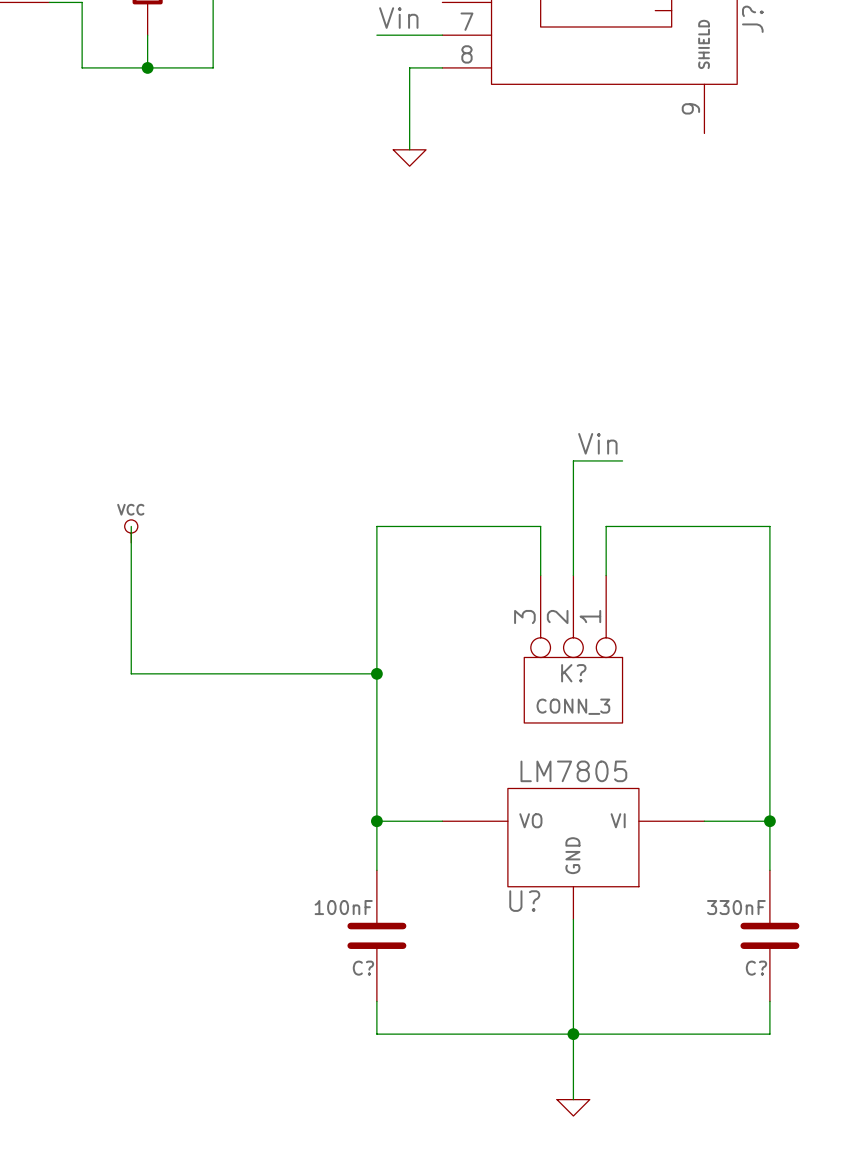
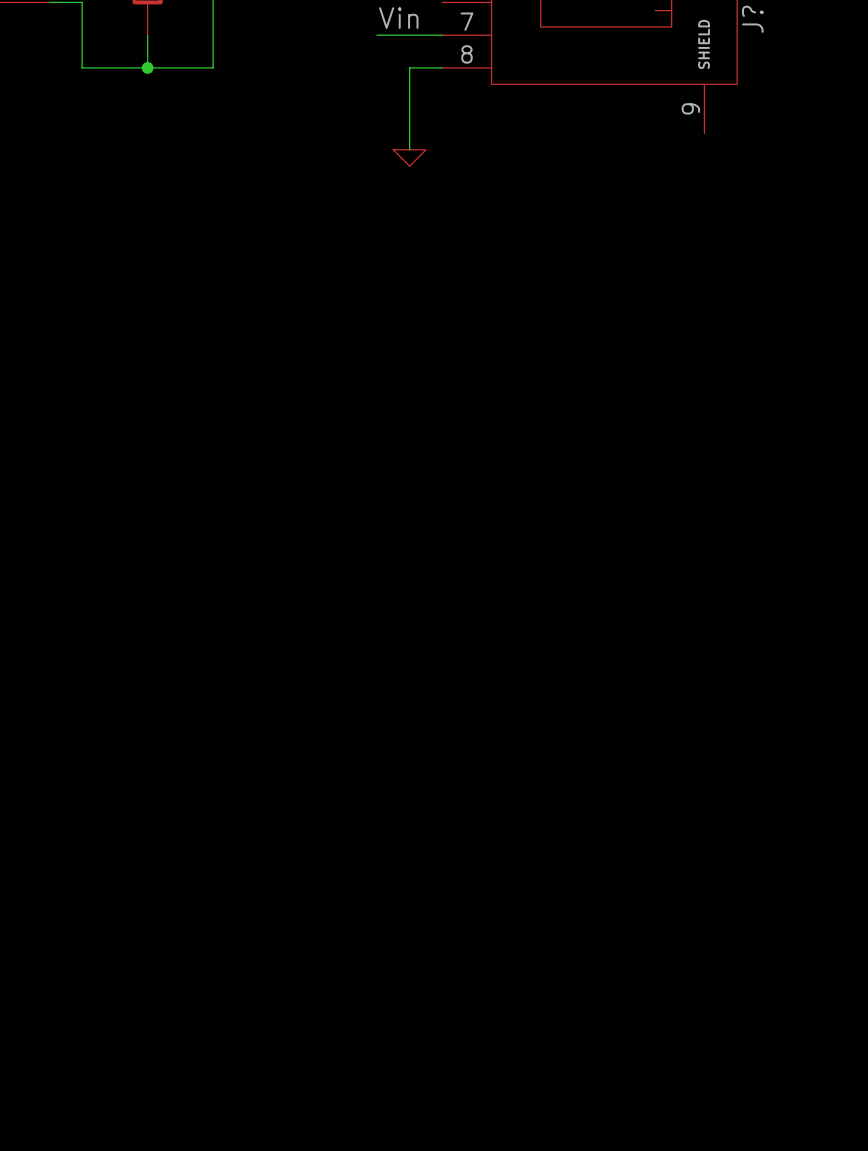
label: Vin (597, 443) -> none
wire: (622, 460) (573, 460) (573, 575) -> none
wire: (131, 526) (131, 673) (376, 673) -> none
power symbol: VCC (131, 531) -> none
wire: (540, 575) (540, 526) (376, 526) (376, 870) -> none
wire: (606, 575) (606, 526) (769, 526) (769, 870) -> none
K?: CONN_3 (573, 649) -> none
junction: (376, 673) -> none
wire: (376, 821) (442, 821) -> none
junction: (376, 821) -> none
wire: (704, 821) (769, 821) -> none
junction: (769, 821) -> none
U?: LM7805 (573, 853) -> none
wire: (573, 919) (573, 1099) -> none
C?: 100nF (376, 935) -> none
C?: 330nF (769, 935) -> none
wire: (376, 1001) (376, 1034) (769, 1034) (769, 1001) -> none
junction: (573, 1034) -> none
power symbol: (573, 1107) -> none

